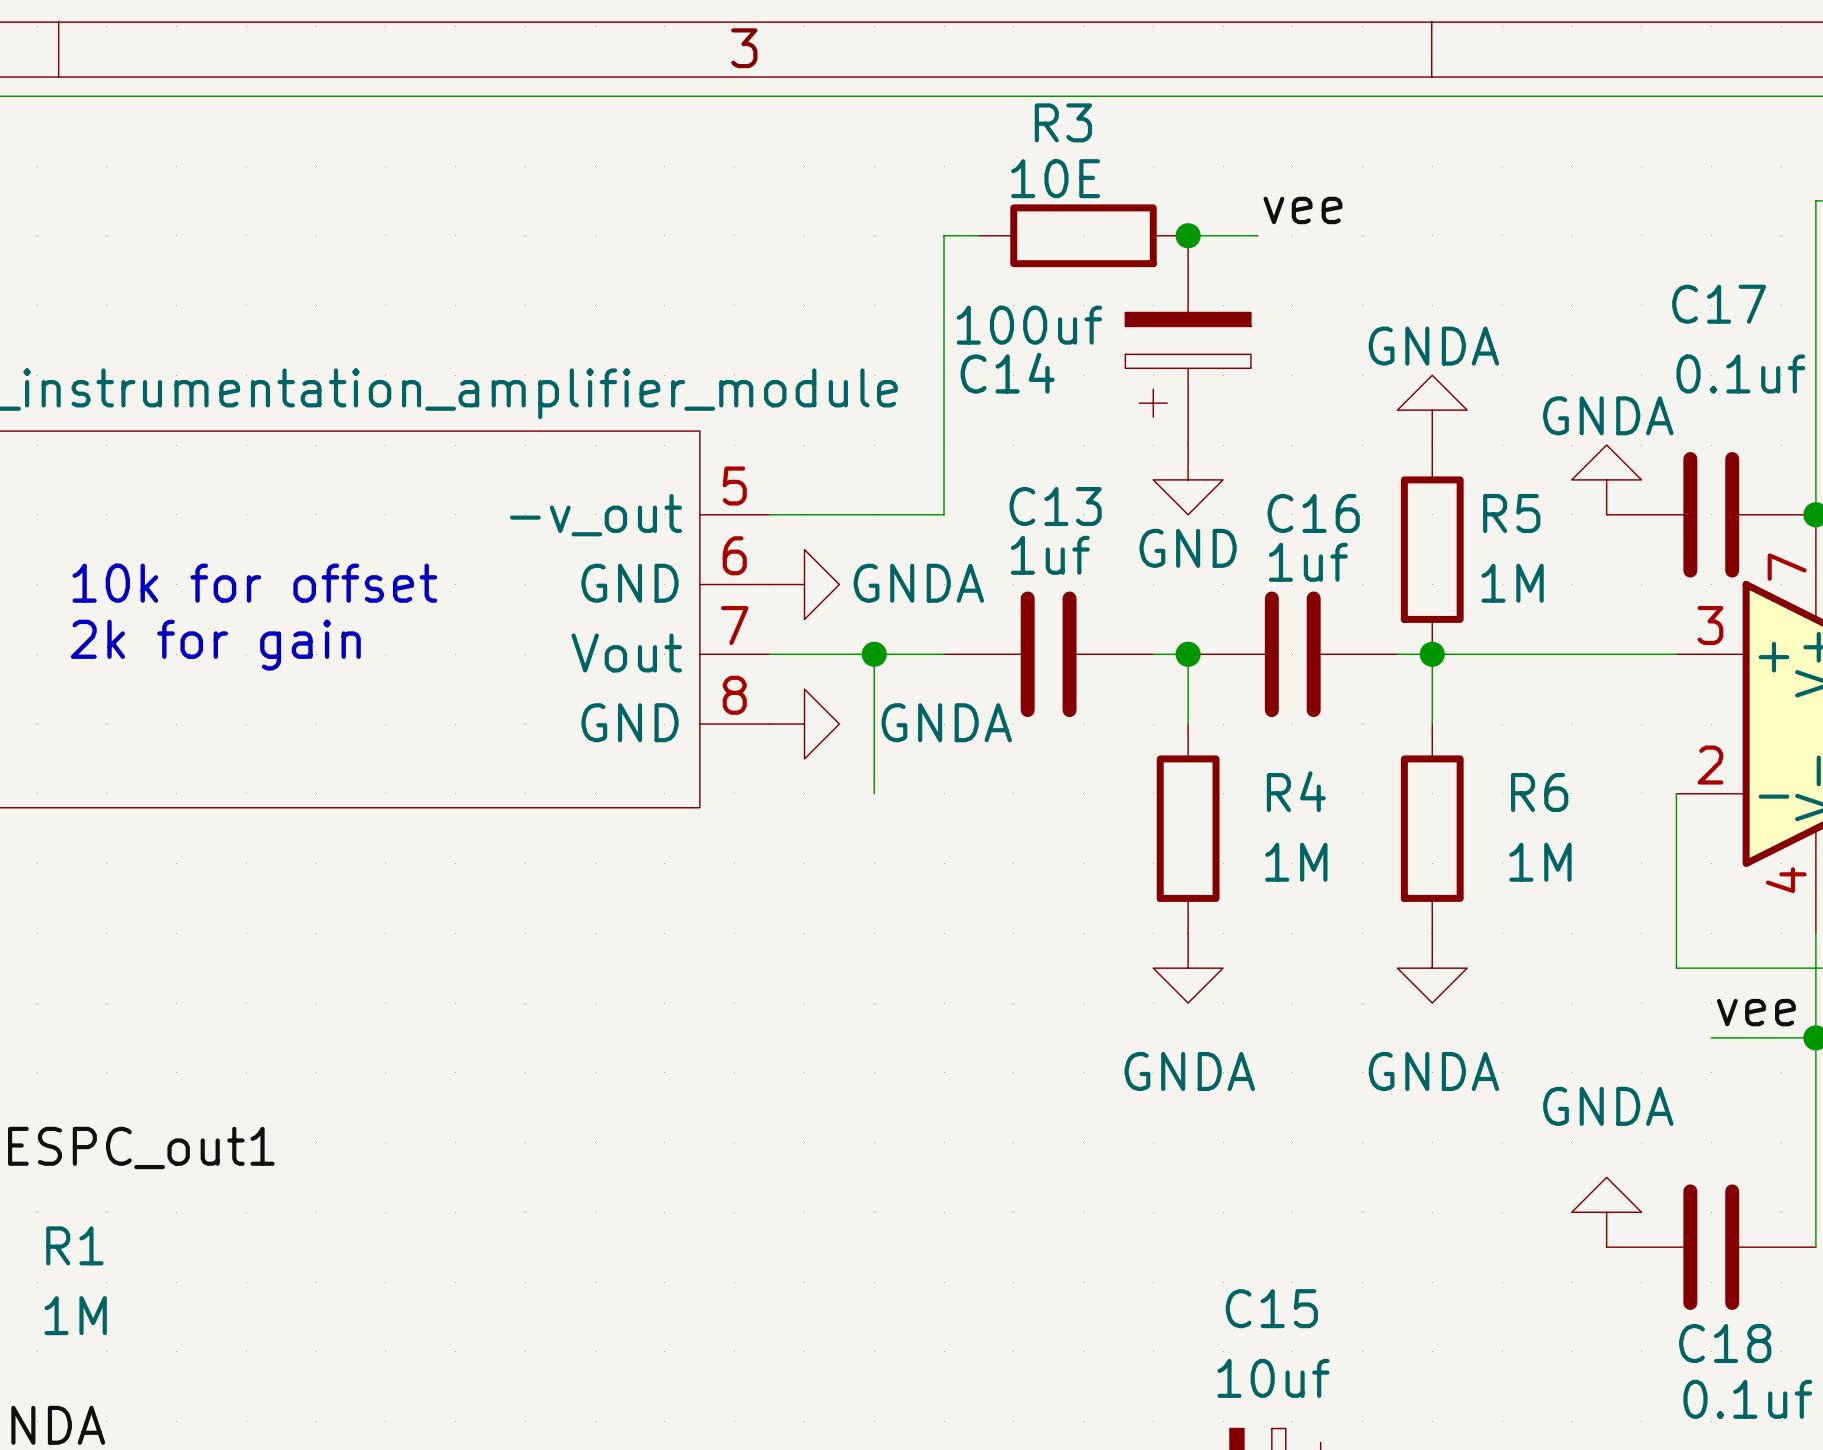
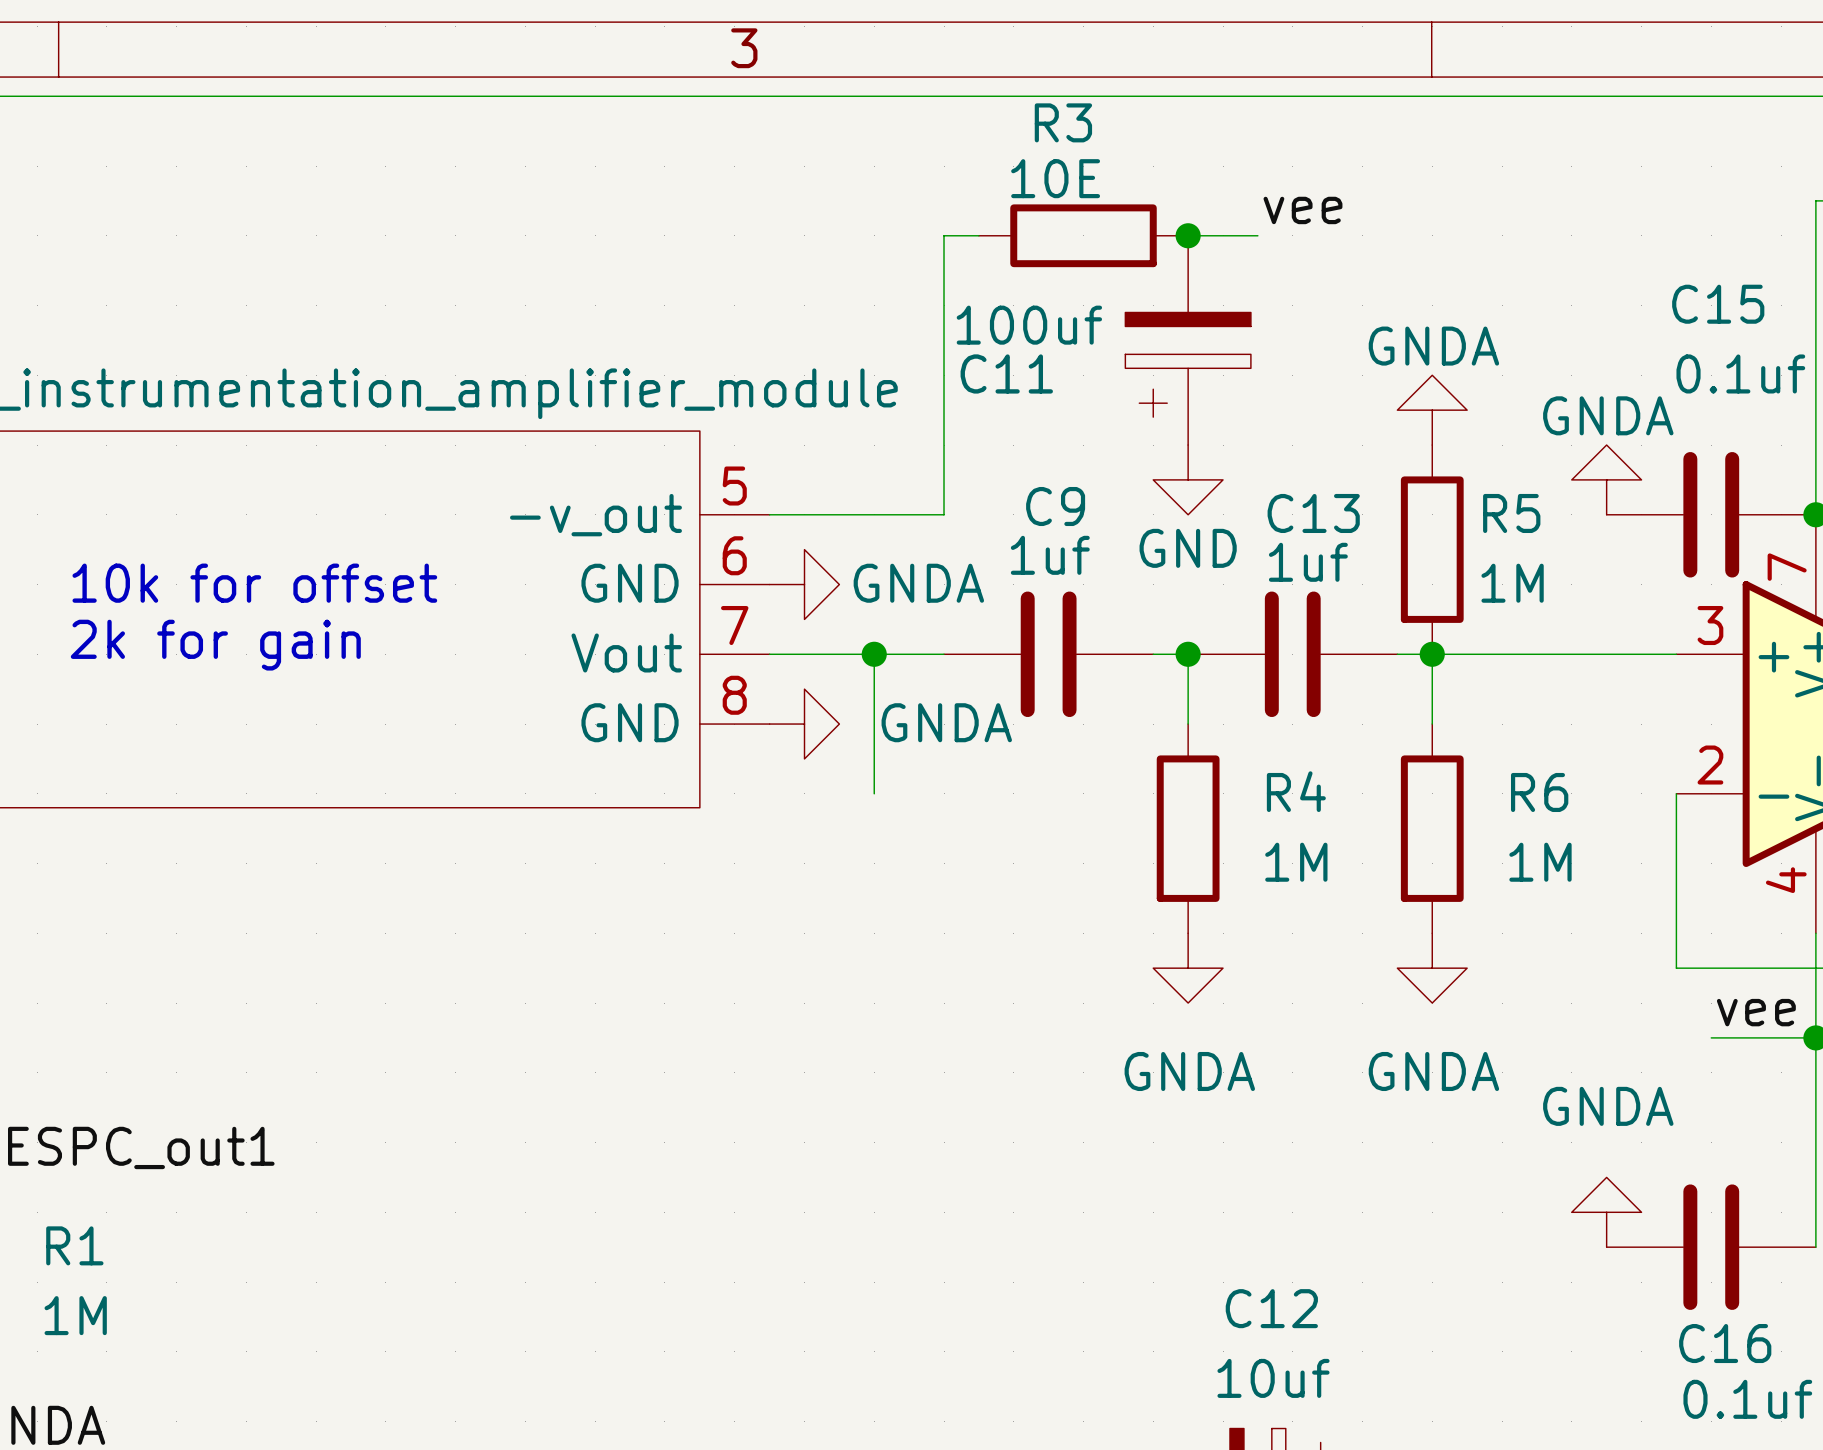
C17 name: C17 (1719, 304) -> C15 (1718, 304)
C14 name: C14 (1007, 373) -> C11 (1006, 373)
C13 name: C13 (1055, 506) -> C9 (1055, 506)
C16 name: C16 (1313, 513) -> C13 (1313, 513)
C15 name: C15 (1271, 1308) -> C12 (1271, 1308)
C18 name: C18 (1725, 1343) -> C16 (1725, 1343)

